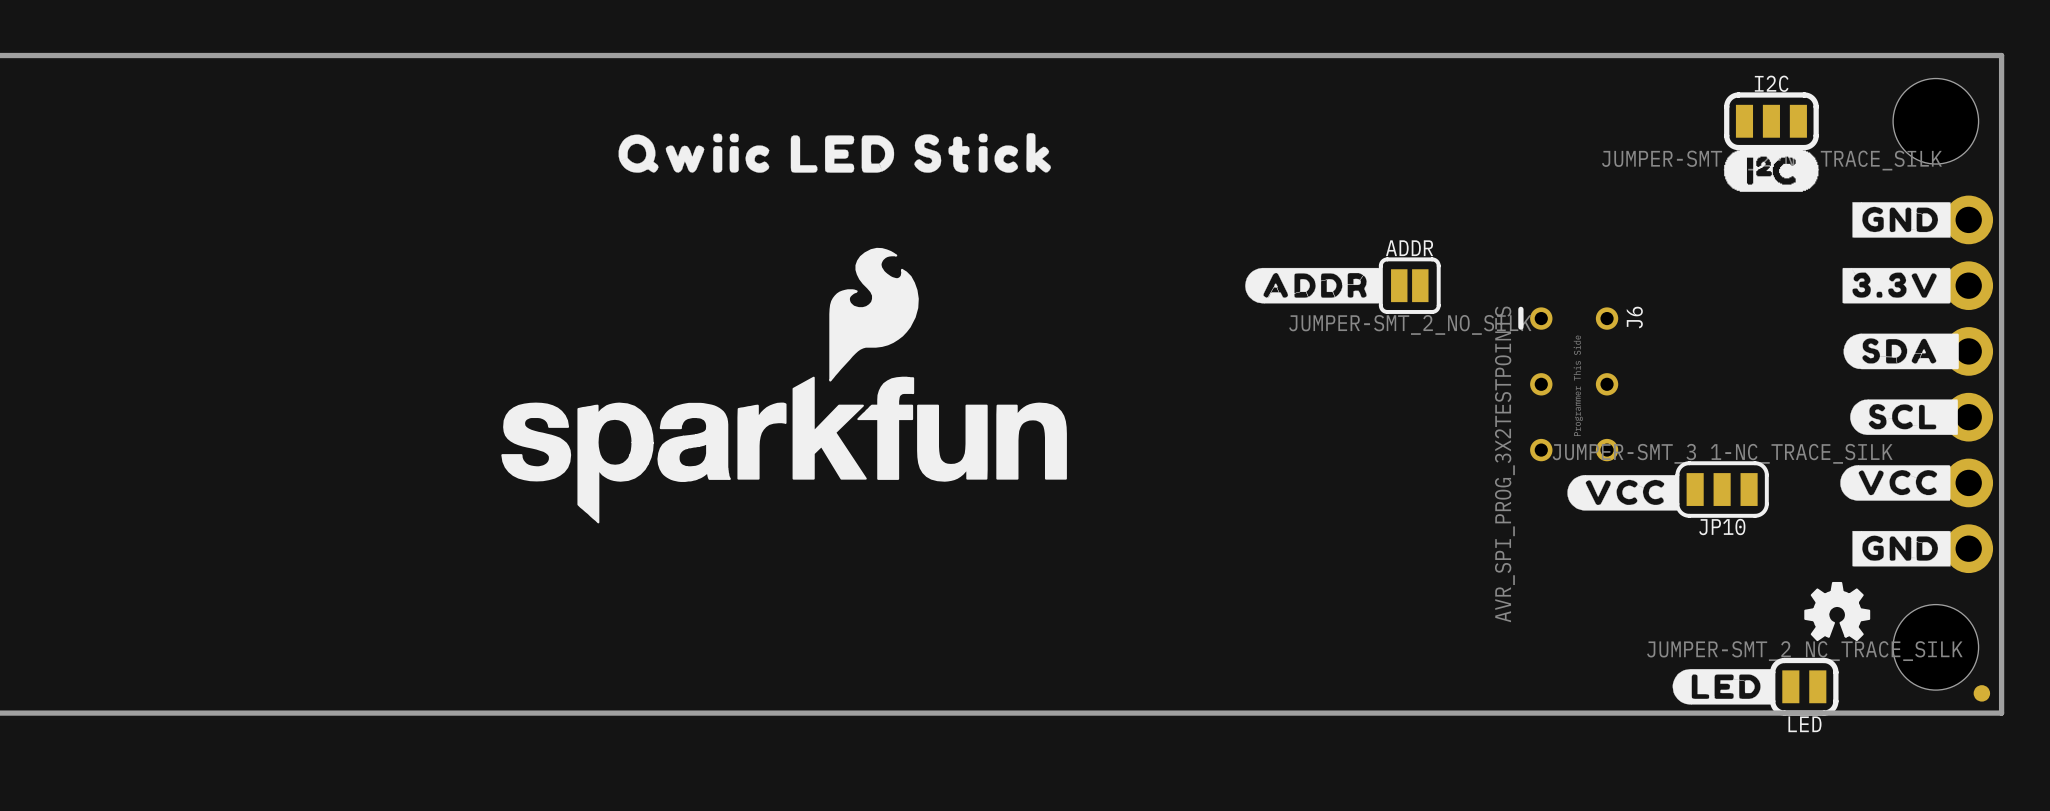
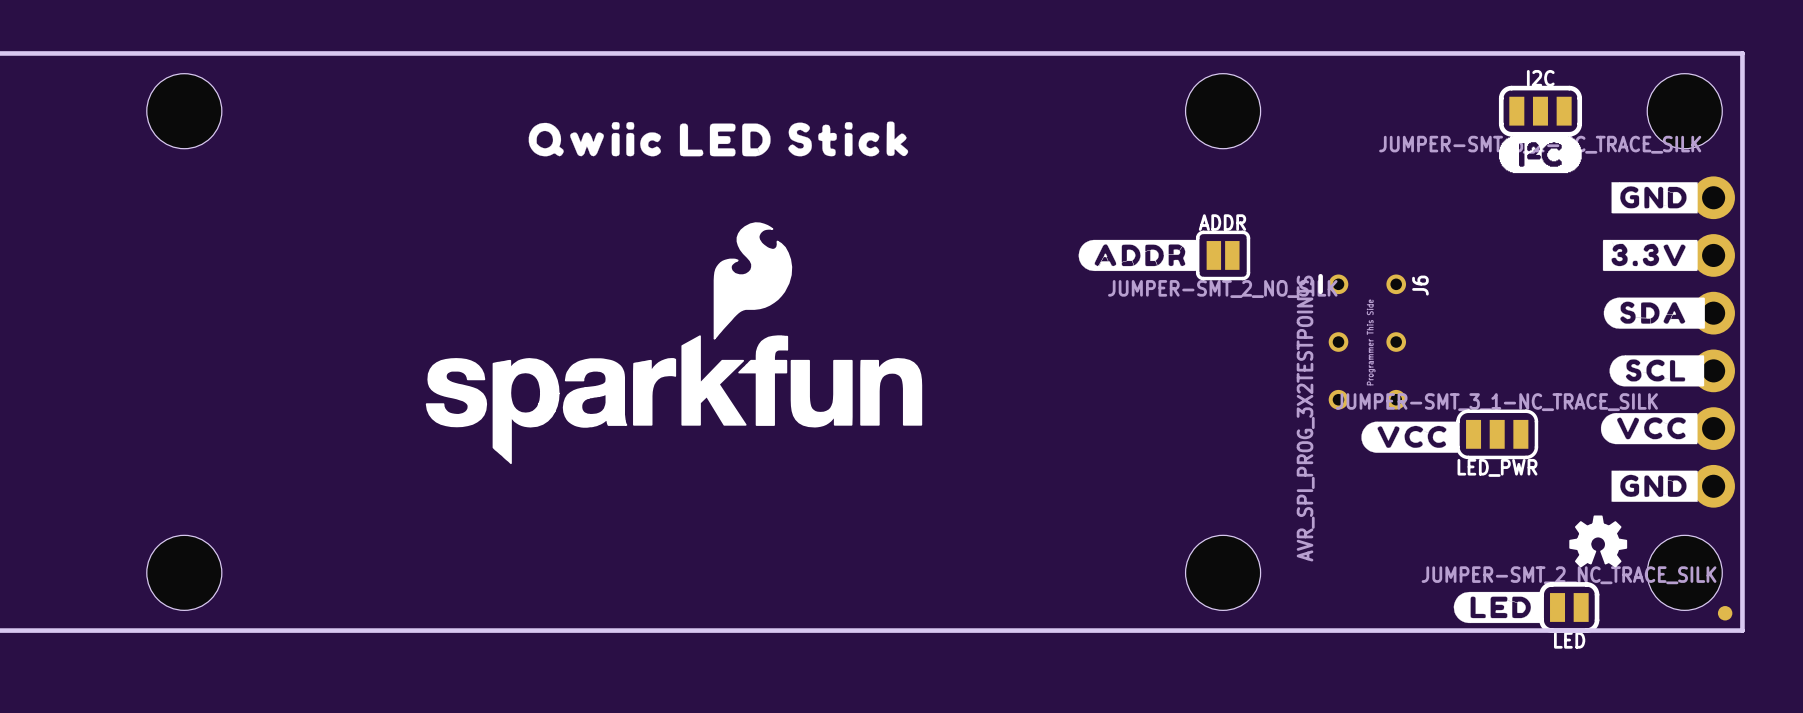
part: none -> (184, 111)
part: none -> (1223, 111)
JP10 name: JP10 (1722, 527) -> LED_PWR (1497, 467)
part: none -> (184, 572)
part: none -> (1223, 572)

